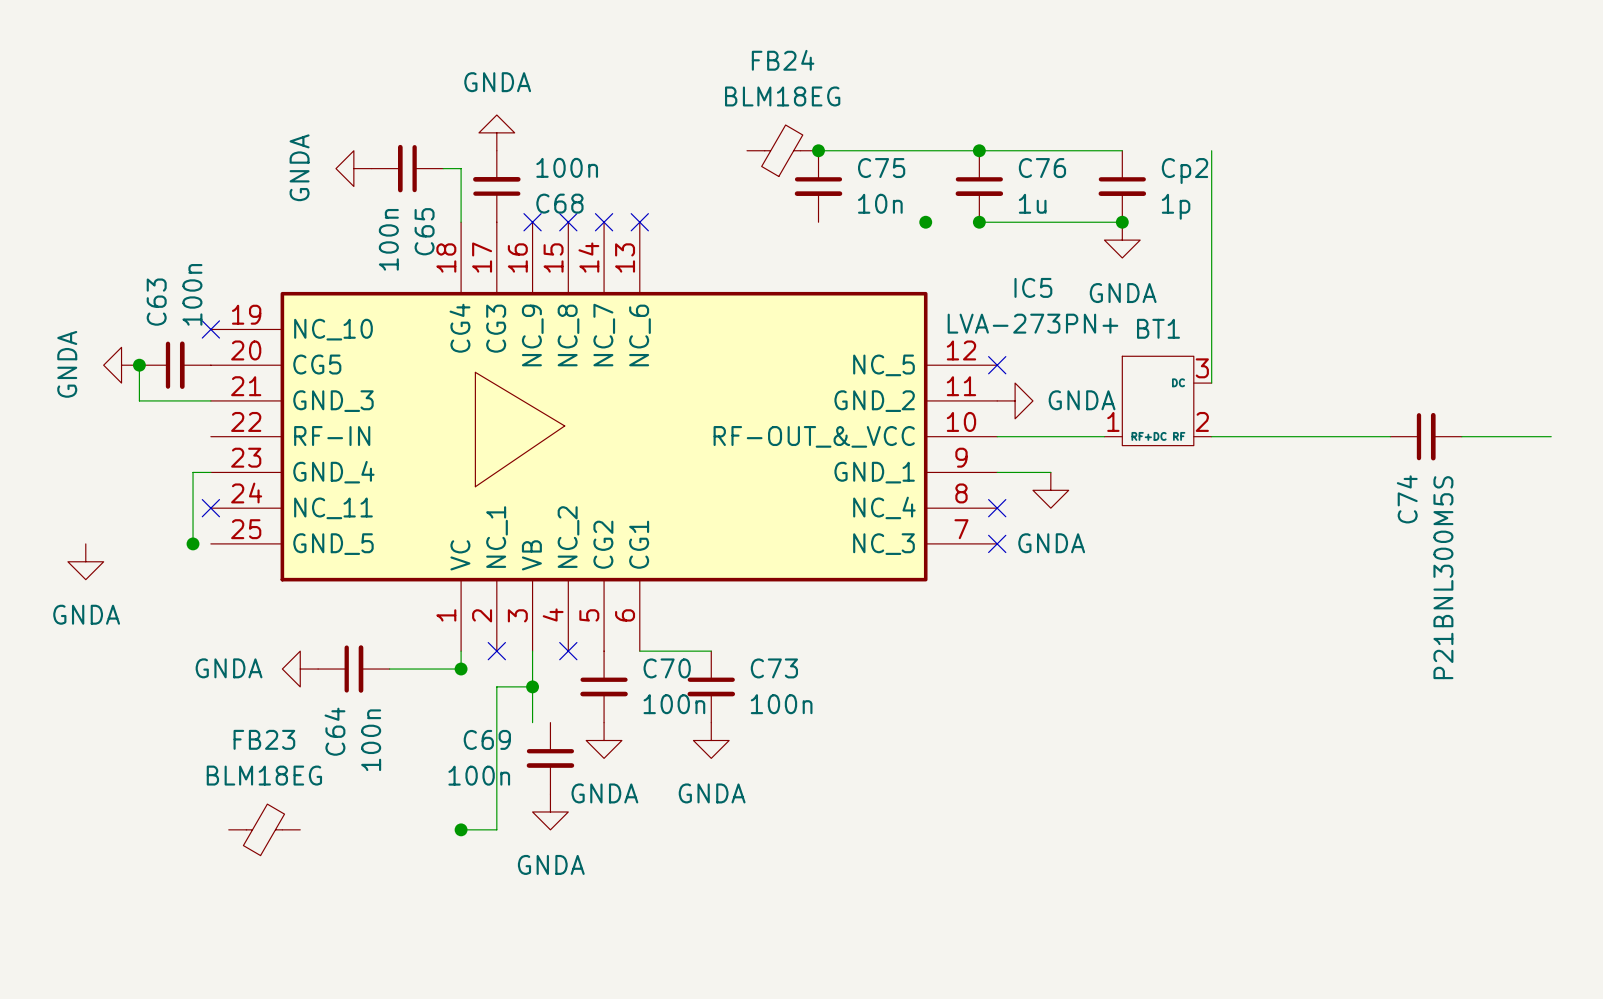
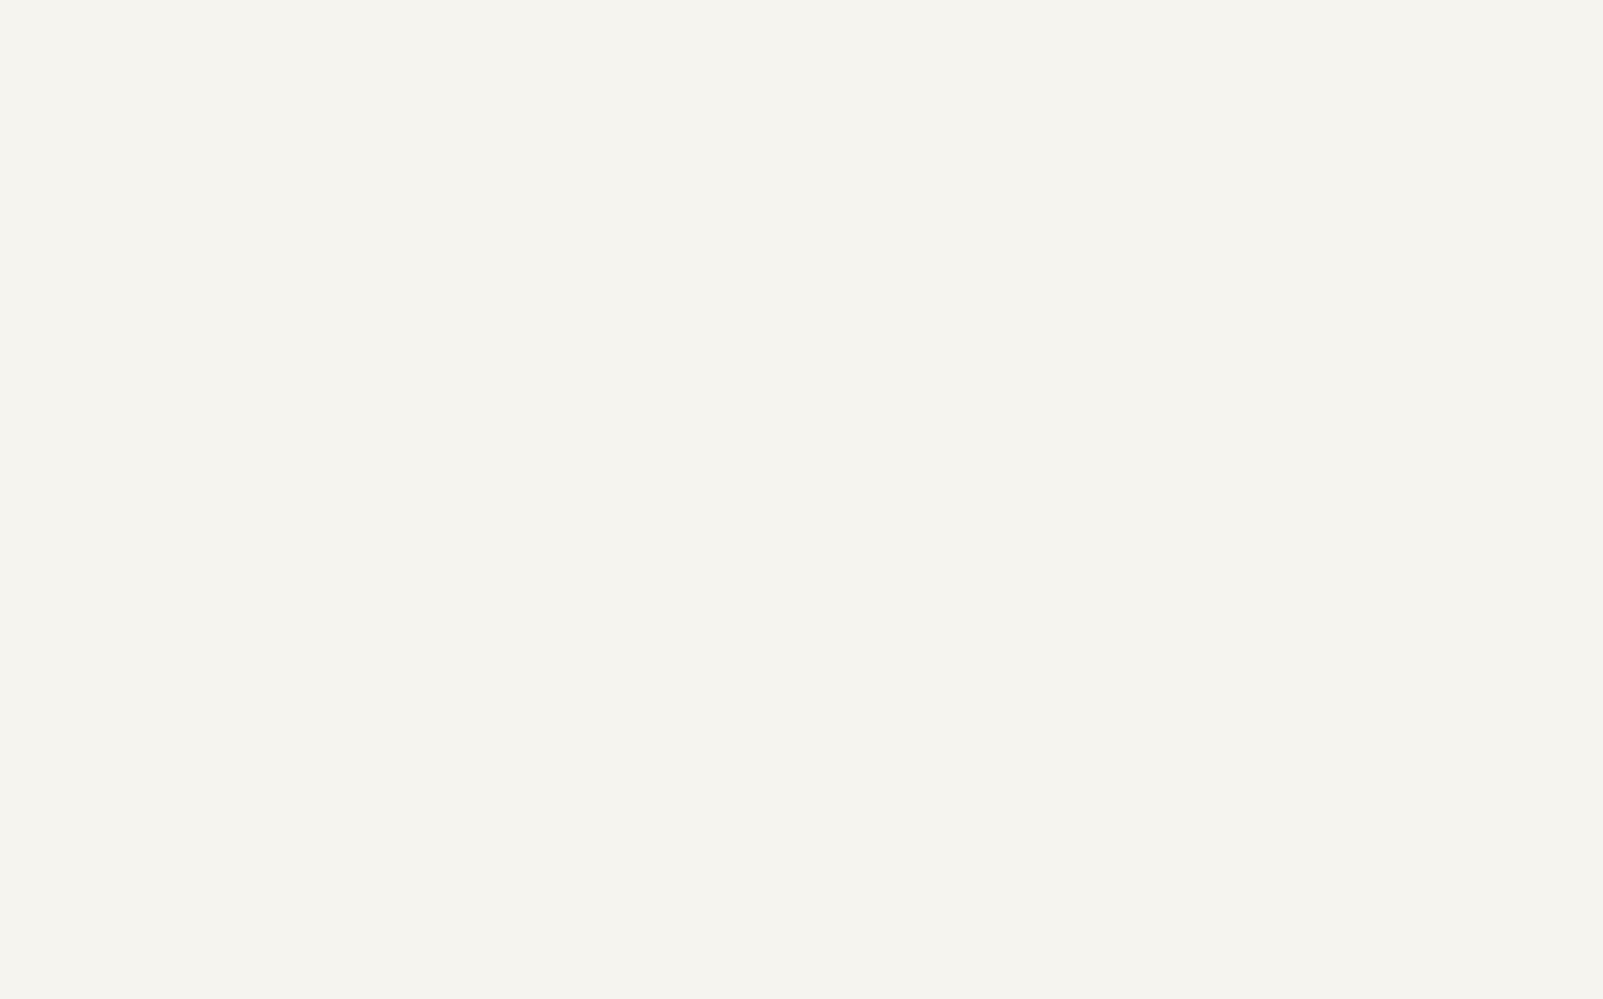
power symbol: GNDA (496, 132) -> none
FB24: BLM18EG (782, 150) -> none
wire: (818, 150) (1122, 150) -> none
junction: (818, 150) -> none
junction: (979, 150) -> none
wire: (1211, 150) (1211, 383) -> none
power symbol: GNDA (353, 168) -> none
C65: 100n (407, 168) -> none
wire: (443, 168) (461, 168) (461, 222) -> none
C68: 100n (496, 186) -> none
C75: 10n (818, 186) -> none
C76: 1u (979, 186) -> none
Cp2: 1p (1122, 186) -> none
no-connect mark: (532, 222) -> none
no-connect mark: (568, 222) -> none
no-connect mark: (604, 222) -> none
no-connect mark: (639, 222) -> none
junction: (925, 222) -> none
wire: (979, 222) (1122, 222) -> none
junction: (979, 222) -> none
junction: (1122, 222) -> none
power symbol: GNDA (1122, 240) -> none
no-connect mark: (210, 329) -> none
power symbol: GNDA (121, 365) -> none
wire: (139, 365) (139, 400) (210, 400) -> none
junction: (139, 365) -> none
C63: 100n (175, 365) -> none
no-connect mark: (997, 365) -> none
power symbol: GNDA (1015, 400) -> none
BT1: (1158, 400) -> none
IC5: LVA-273PN+ (604, 436) -> none
wire: (997, 436) (1104, 436) -> none
wire: (1211, 436) (1390, 436) -> none
C74: P21BNL300M5S (1426, 436) -> none
wire: (1461, 436) (1551, 436) -> none
wire: (210, 472) (193, 472) (193, 543) -> none
wire: (997, 472) (1050, 472) -> none
power symbol: GNDA (1050, 490) -> none
no-connect mark: (210, 508) -> none
no-connect mark: (997, 508) -> none
junction: (193, 543) -> none
no-connect mark: (997, 543) -> none
power symbol: GNDA (85, 561) -> none
wire: (461, 651) (461, 669) (389, 669) -> none
no-connect mark: (496, 651) -> none
wire: (532, 651) (532, 722) -> none
no-connect mark: (568, 651) -> none
wire: (639, 651) (711, 651) -> none
power symbol: GNDA (300, 669) -> none
C64: 100n (353, 669) -> none
junction: (461, 669) -> none
wire: (532, 686) (496, 686) (496, 829) (461, 829) -> none
junction: (532, 686) -> none
C70: 100n (604, 686) -> none
C73: 100n (711, 686) -> none
power symbol: GNDA (604, 740) -> none
power symbol: GNDA (711, 740) -> none
C69: 100n (550, 758) -> none
power symbol: GNDA (550, 811) -> none
FB23: BLM18EG (264, 829) -> none
junction: (461, 829) -> none

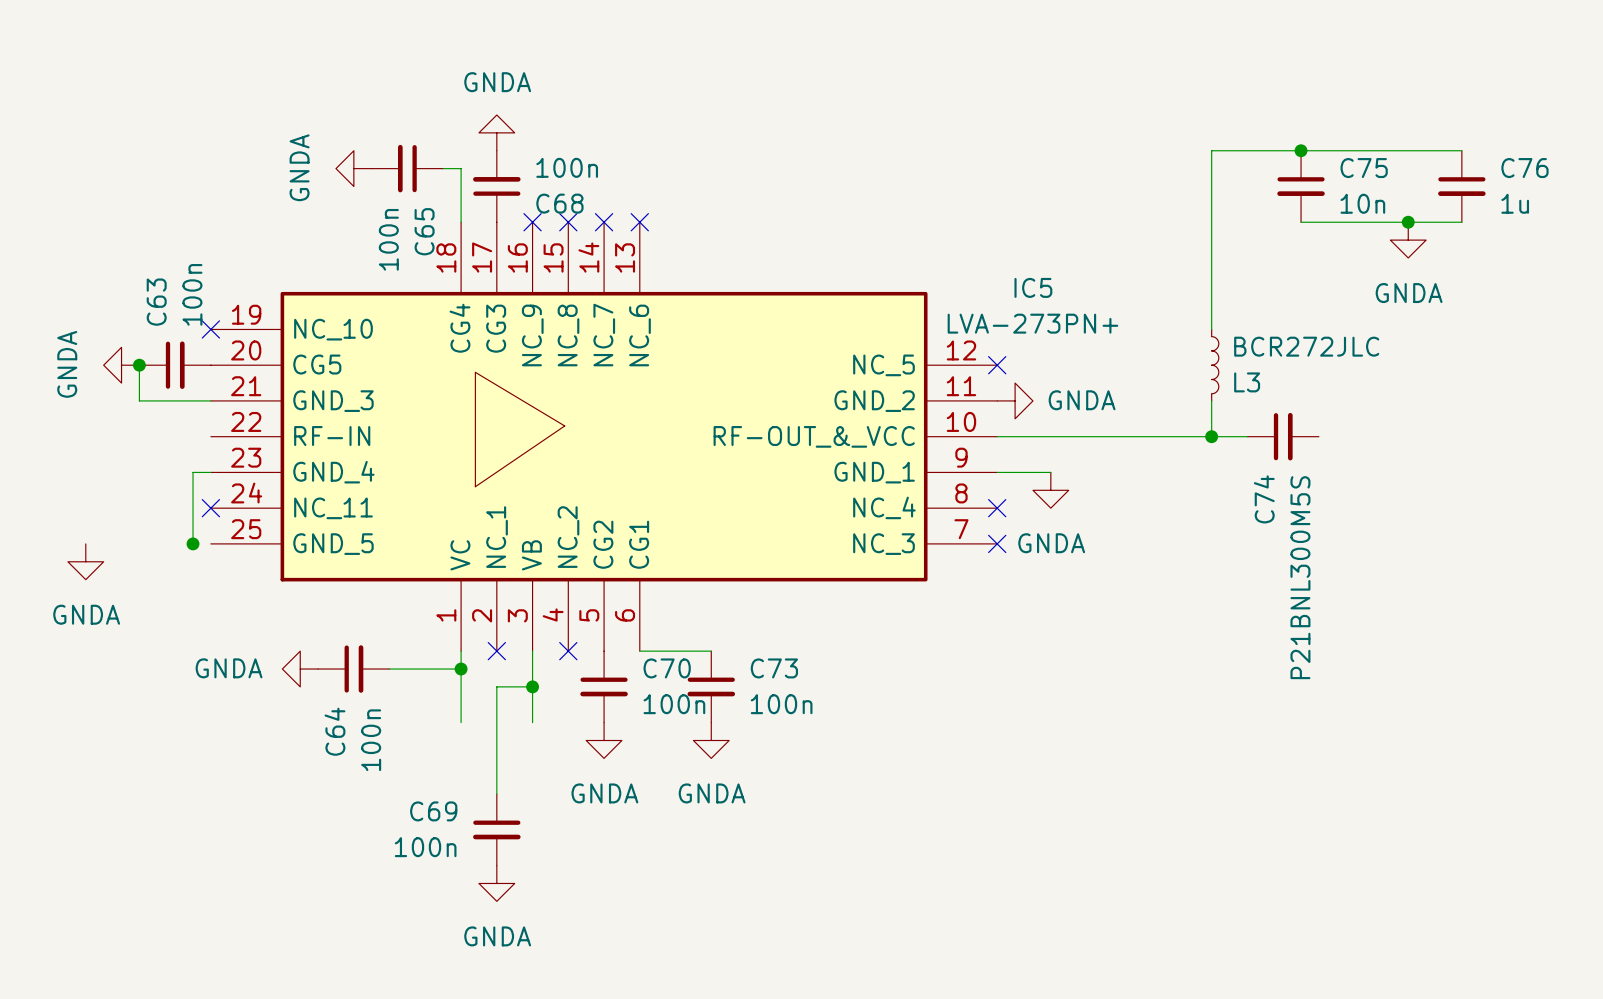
power symbol: none -> GNDA (496, 132)
junction: none -> (1301, 150)
wire: none -> (1461, 150) (1211, 150) (1211, 329)
power symbol: none -> GNDA (353, 168)
C65: none -> 100n (407, 168)
wire: none -> (443, 168) (461, 168) (461, 222)
C68: none -> 100n (496, 186)
C75: none -> 10n (1301, 186)
C76: none -> 1u (1461, 186)
no-connect mark: none -> (532, 222)
no-connect mark: none -> (568, 222)
no-connect mark: none -> (604, 222)
no-connect mark: none -> (639, 222)
wire: none -> (1301, 222) (1461, 222)
junction: none -> (1408, 222)
power symbol: none -> GNDA (1408, 240)
no-connect mark: none -> (210, 329)
power symbol: none -> GNDA (121, 365)
wire: none -> (139, 365) (139, 400) (210, 400)
junction: none -> (139, 365)
C63: none -> 100n (175, 365)
no-connect mark: none -> (997, 365)
L3: none -> BCR272JLC (1215, 365)
power symbol: none -> GNDA (1015, 400)
wire: none -> (1211, 400) (1211, 436)
IC5: none -> LVA-273PN+ (604, 436)
wire: none -> (997, 436) (1247, 436)
junction: none -> (1211, 436)
C74: none -> P21BNL300M5S (1283, 436)
wire: none -> (210, 472) (193, 472) (193, 543)
wire: none -> (997, 472) (1050, 472)
power symbol: none -> GNDA (1050, 490)
no-connect mark: none -> (210, 508)
no-connect mark: none -> (997, 508)
junction: none -> (193, 543)
no-connect mark: none -> (997, 543)
power symbol: none -> GNDA (85, 561)
wire: none -> (461, 651) (461, 722)
no-connect mark: none -> (496, 651)
wire: none -> (532, 651) (532, 722)
no-connect mark: none -> (568, 651)
wire: none -> (639, 651) (711, 651)
power symbol: none -> GNDA (300, 669)
C64: none -> 100n (353, 669)
wire: none -> (389, 669) (461, 669)
junction: none -> (461, 669)
wire: none -> (532, 686) (496, 686) (496, 794)
junction: none -> (532, 686)
C70: none -> 100n (604, 686)
C73: none -> 100n (711, 686)
power symbol: none -> GNDA (604, 740)
power symbol: none -> GNDA (711, 740)
C69: none -> 100n (496, 829)
power symbol: none -> GNDA (496, 883)

